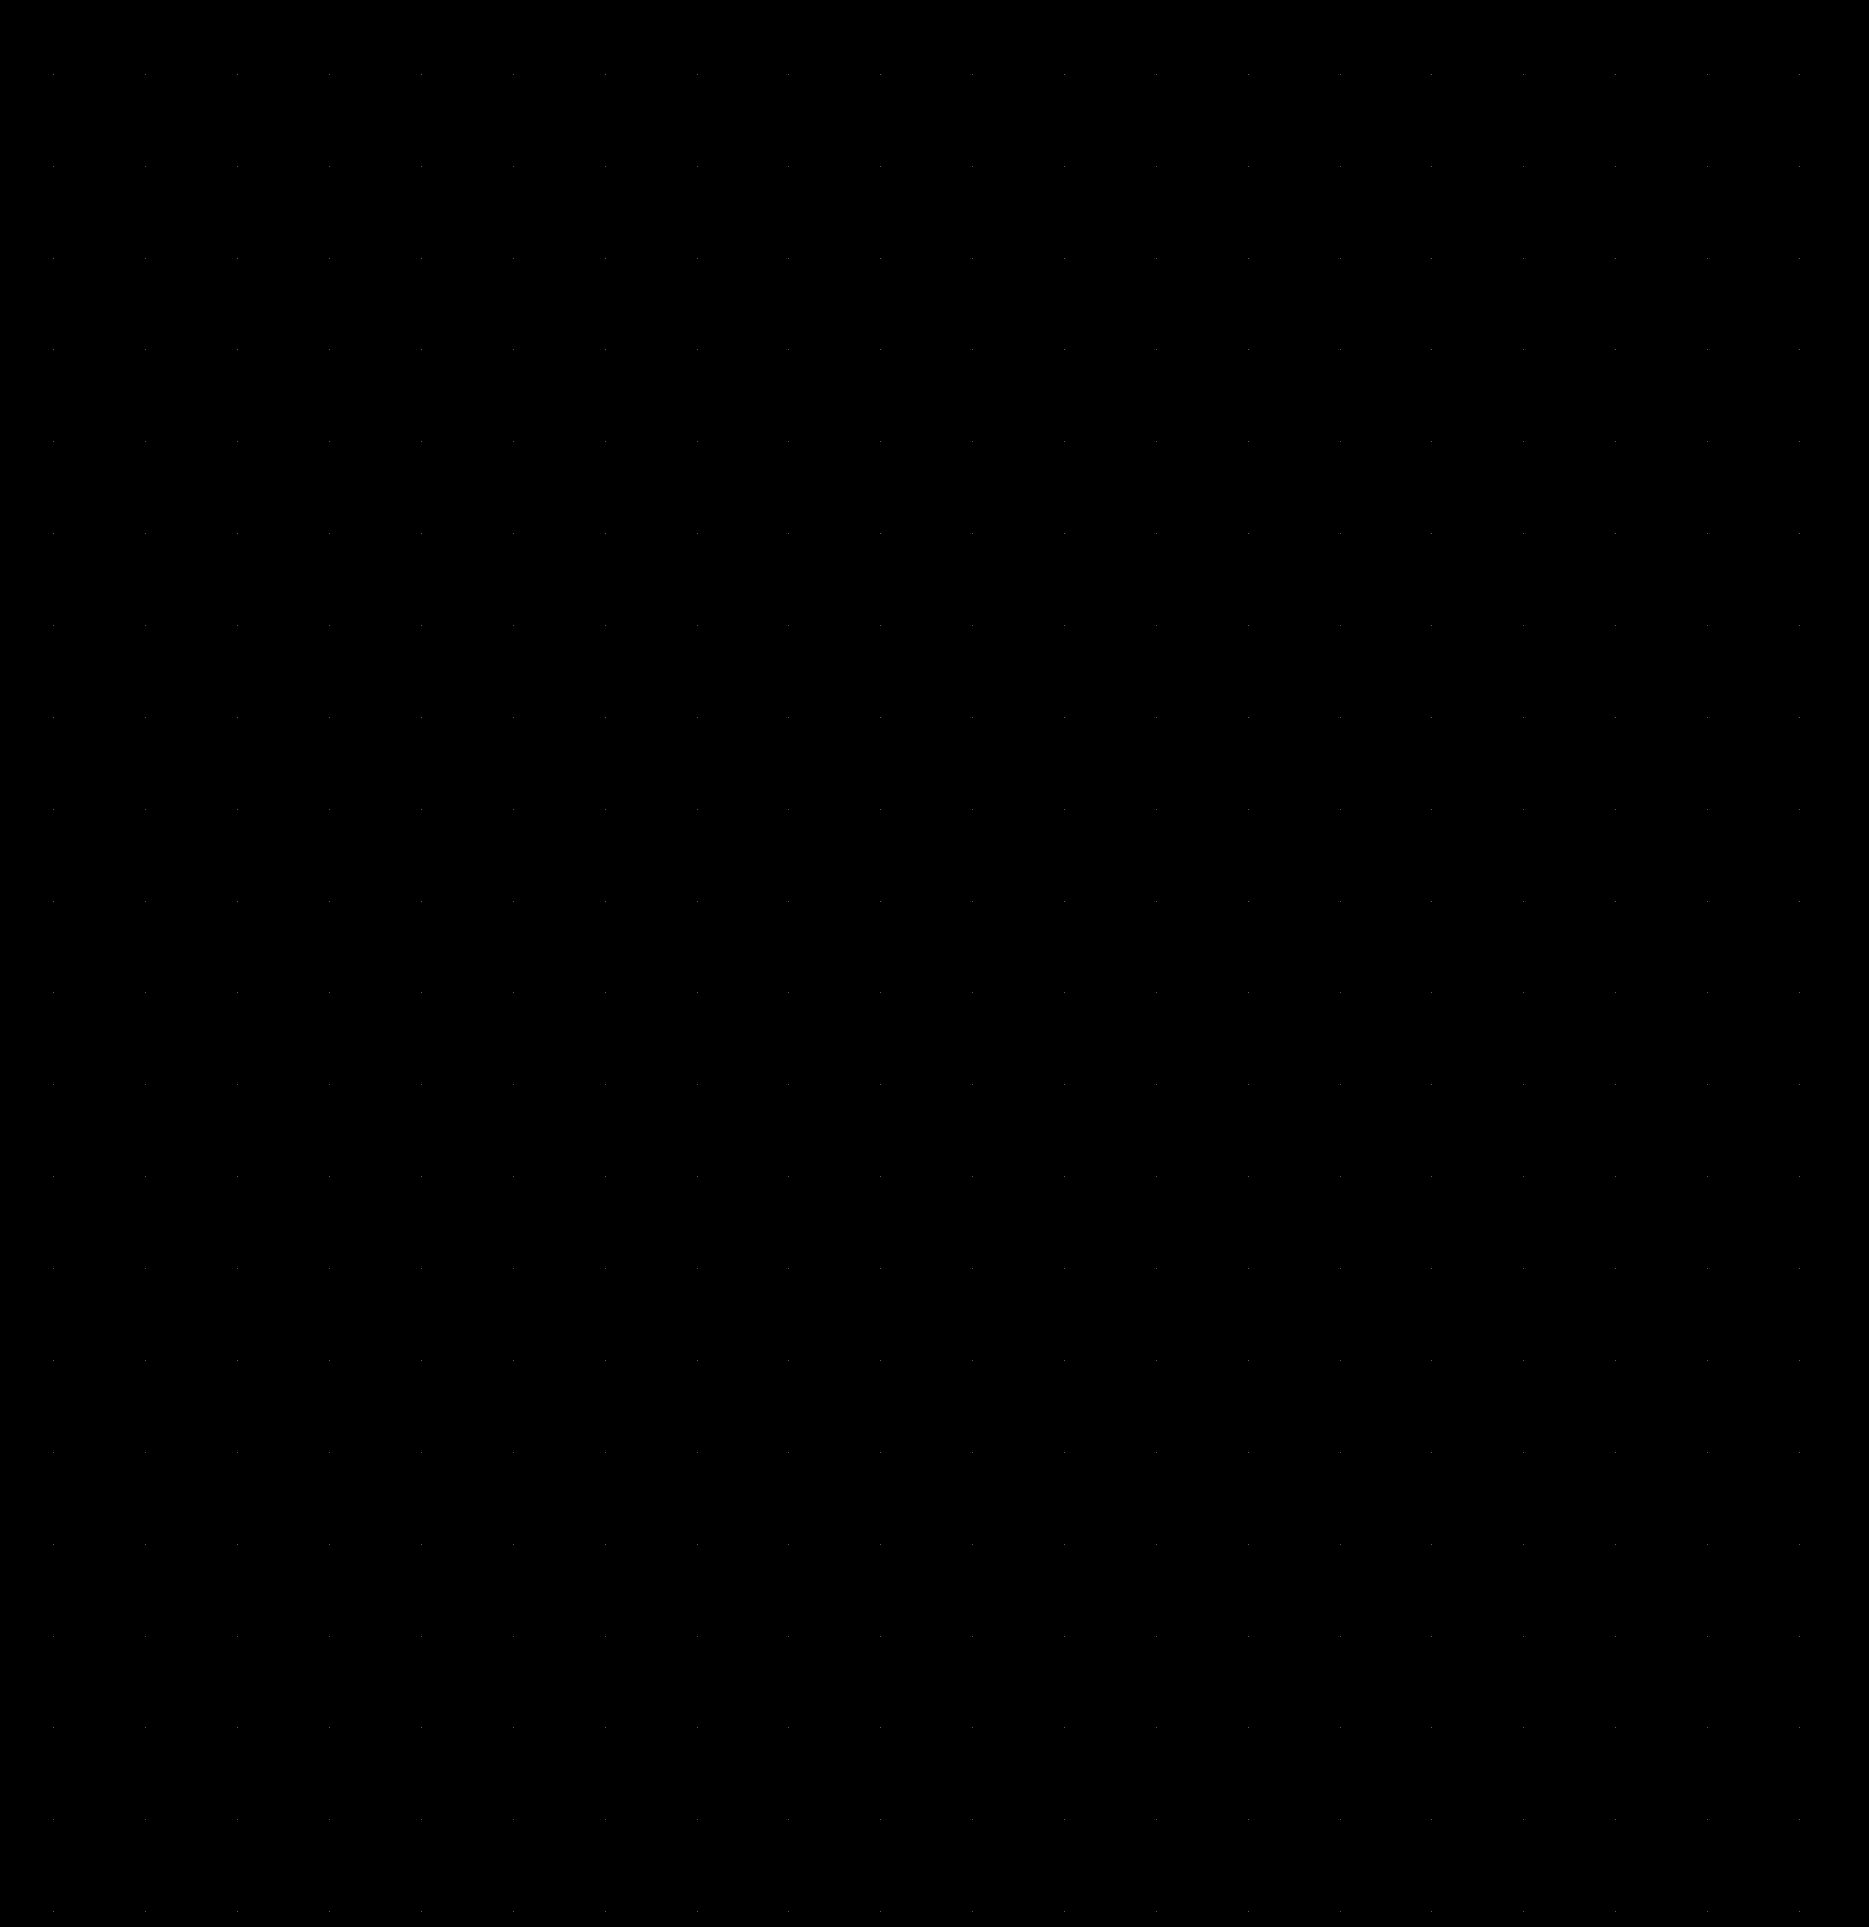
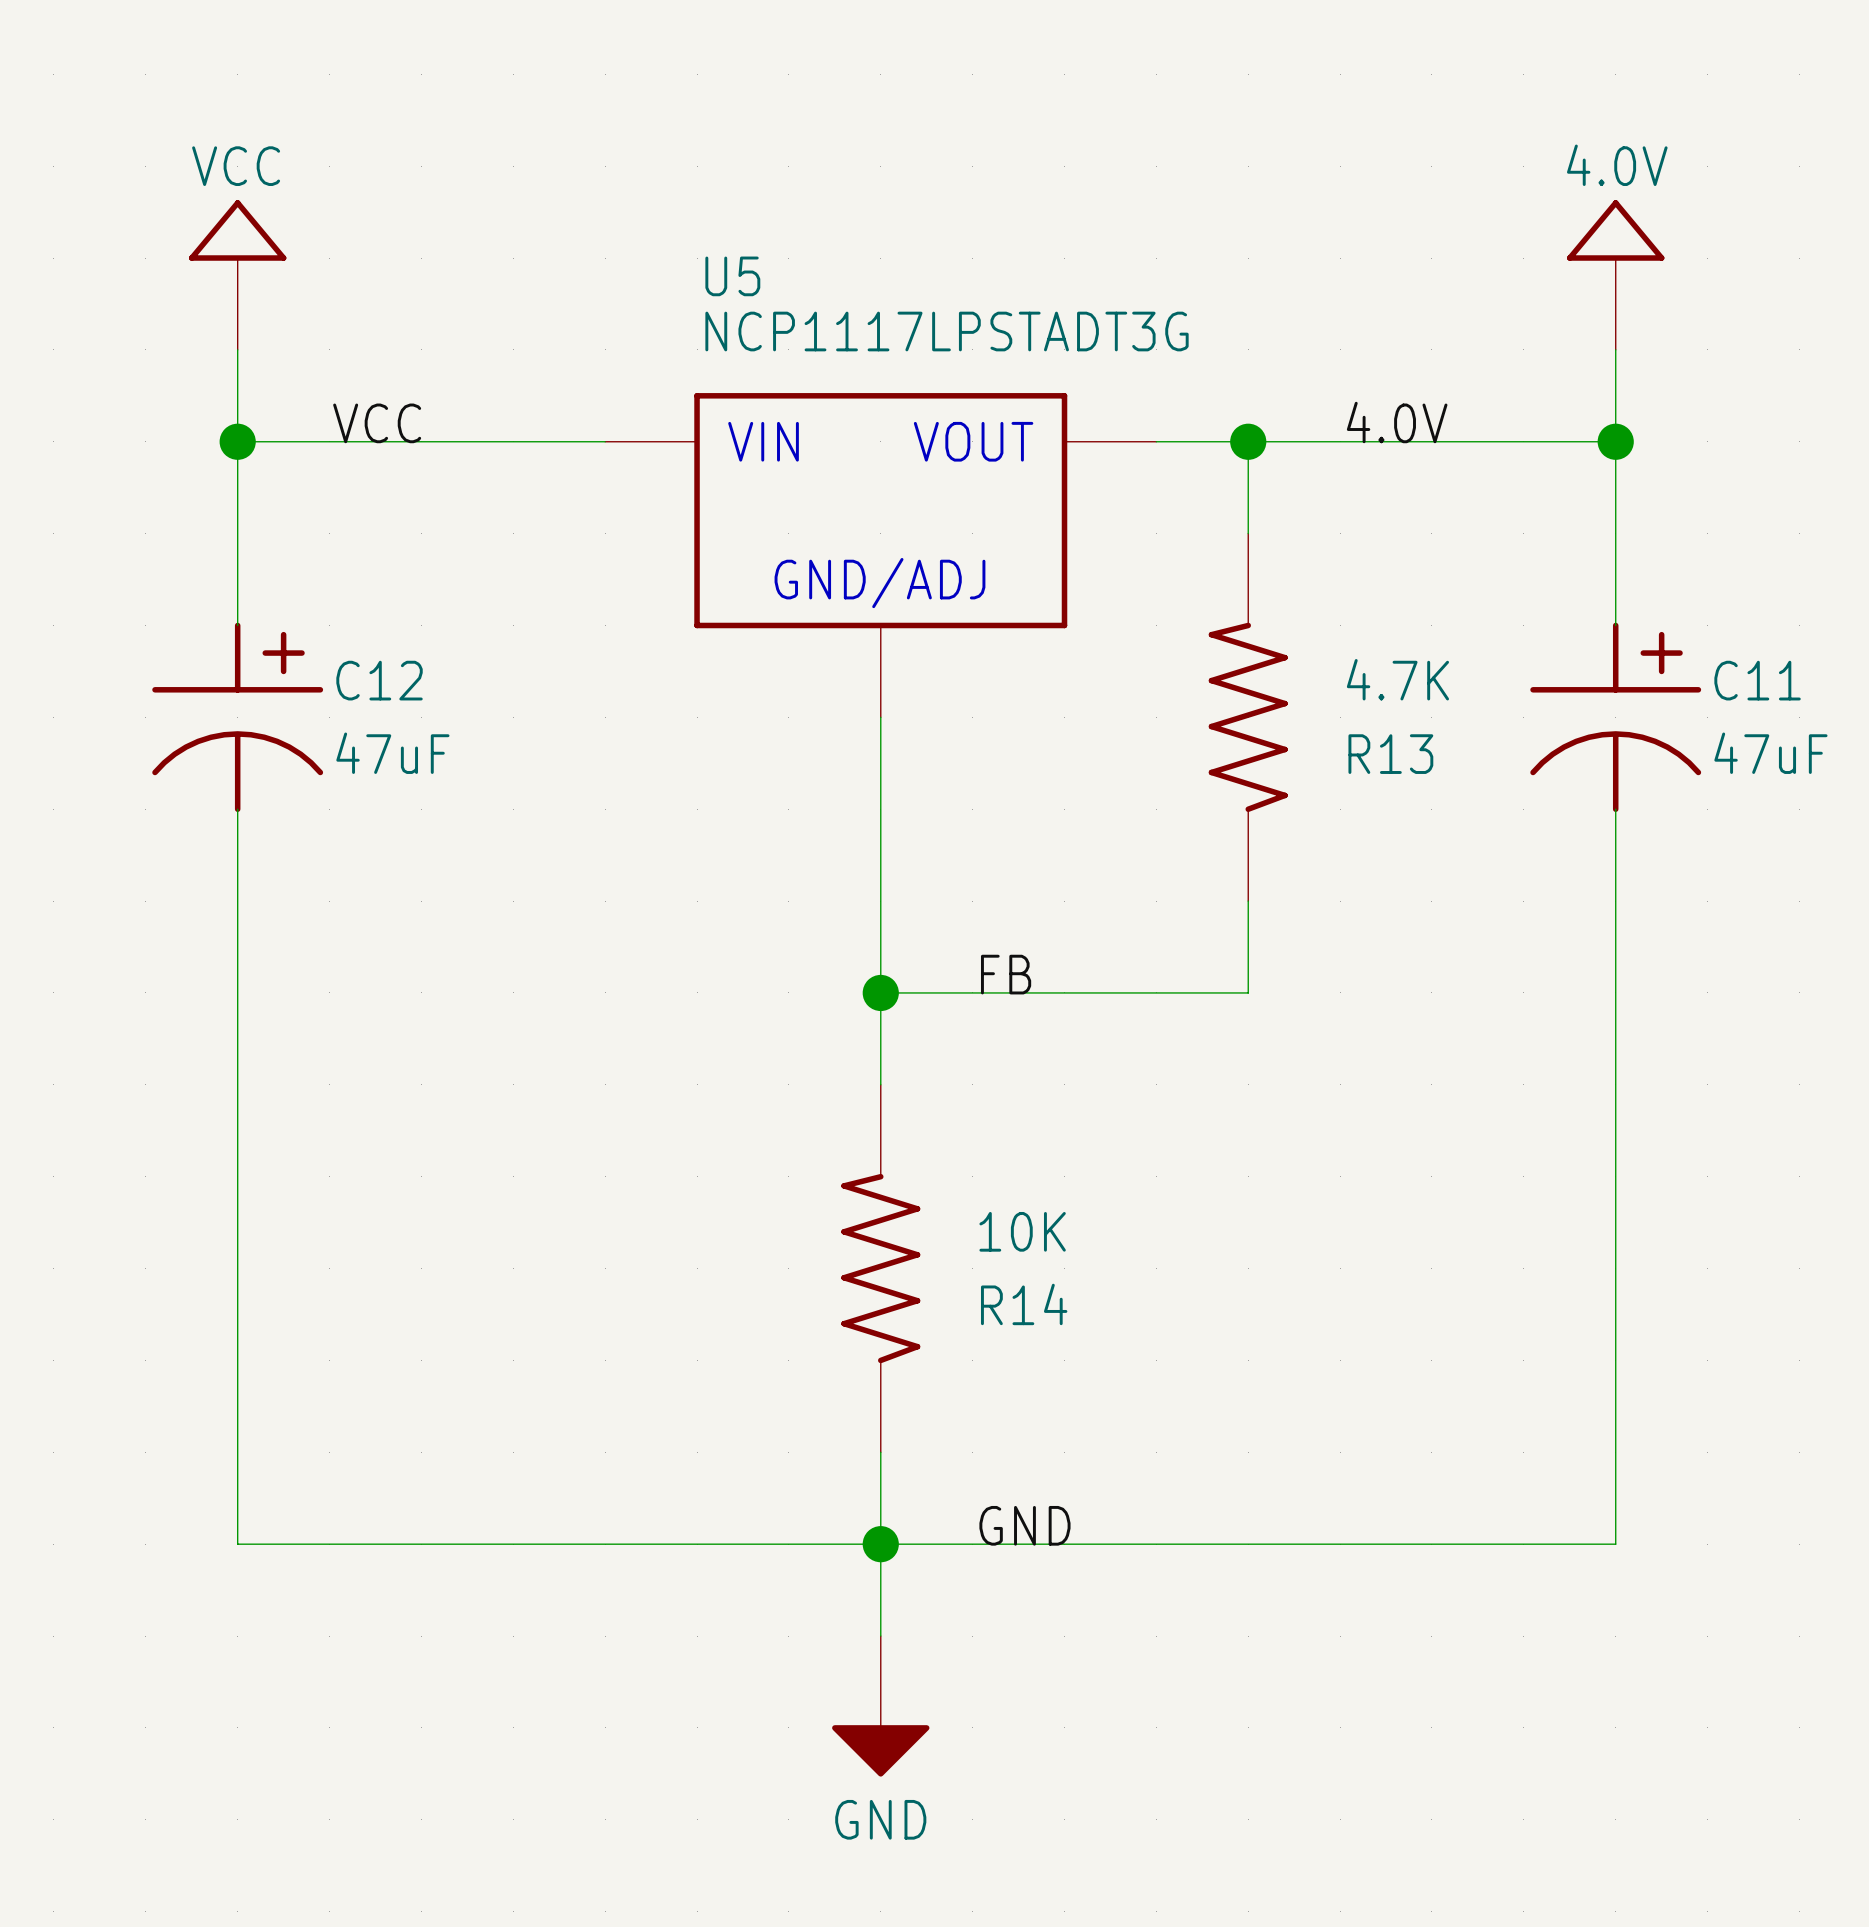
power symbol: none -> VCC (237, 275)
power symbol: none -> 4.0V (1615, 275)
wire: none -> (237, 349) (237, 625)
wire: none -> (1615, 349) (1615, 625)
label: none -> VCC (377, 423)
label: none -> 4.0V (1397, 422)
wire: none -> (237, 441) (605, 441)
junction: none -> (237, 441)
wire: none -> (1156, 441) (1615, 441)
wire: none -> (1248, 441) (1248, 533)
junction: none -> (1248, 441)
junction: none -> (1615, 441)
U5: none -> NCP1117LPSTADT3G (880, 555)
C12: none -> 47uF (237, 717)
wire: none -> (880, 717) (880, 1084)
R13: none -> 4.7K (1248, 717)
C11: none -> 47uF (1615, 717)
wire: none -> (237, 809) (237, 1544) (1615, 1544) (1615, 809)
wire: none -> (1248, 901) (1248, 992) (880, 992)
label: none -> FB (1006, 974)
junction: none -> (880, 992)
R14: none -> 10K (880, 1268)
wire: none -> (880, 1452) (880, 1636)
label: none -> GND (1024, 1525)
junction: none -> (880, 1544)
power symbol: none -> GND (880, 1706)

